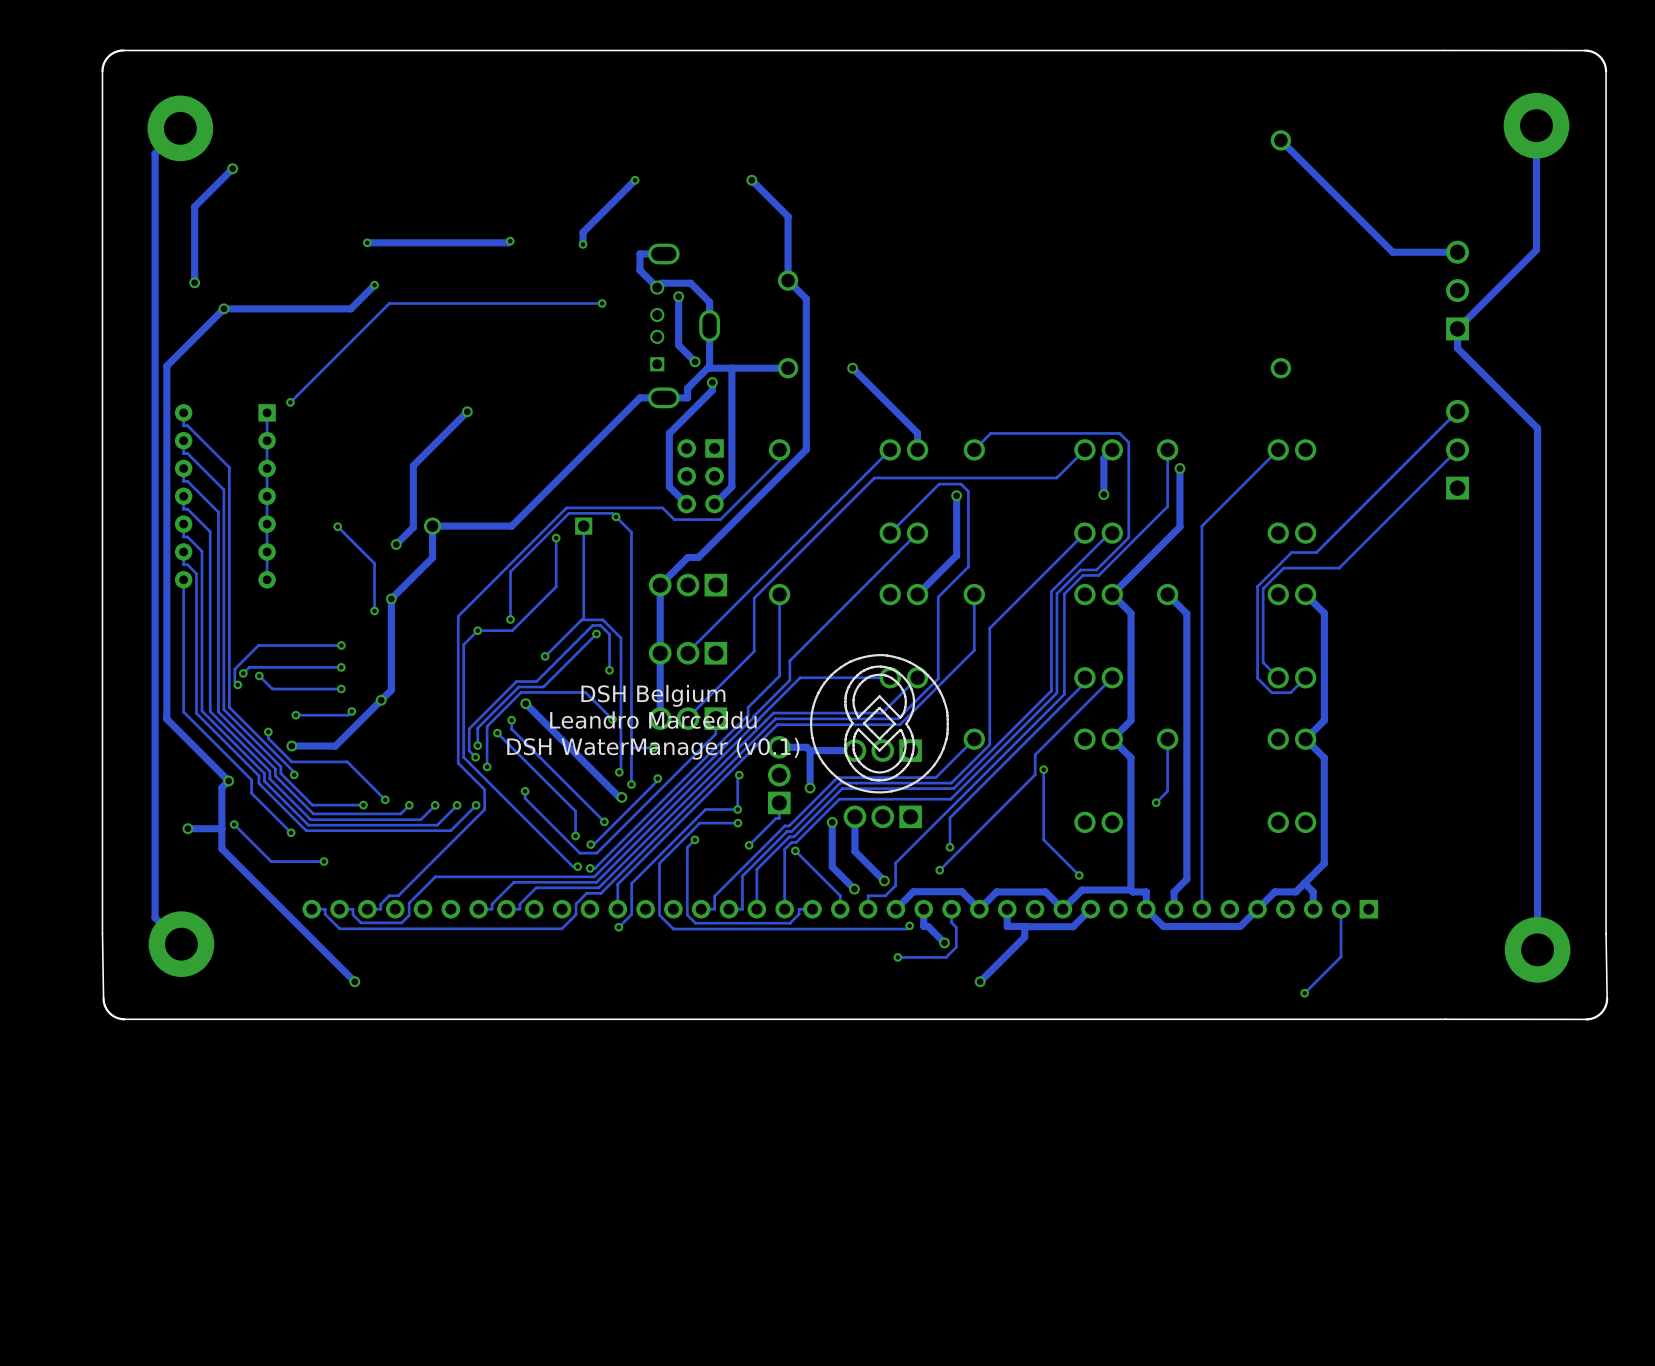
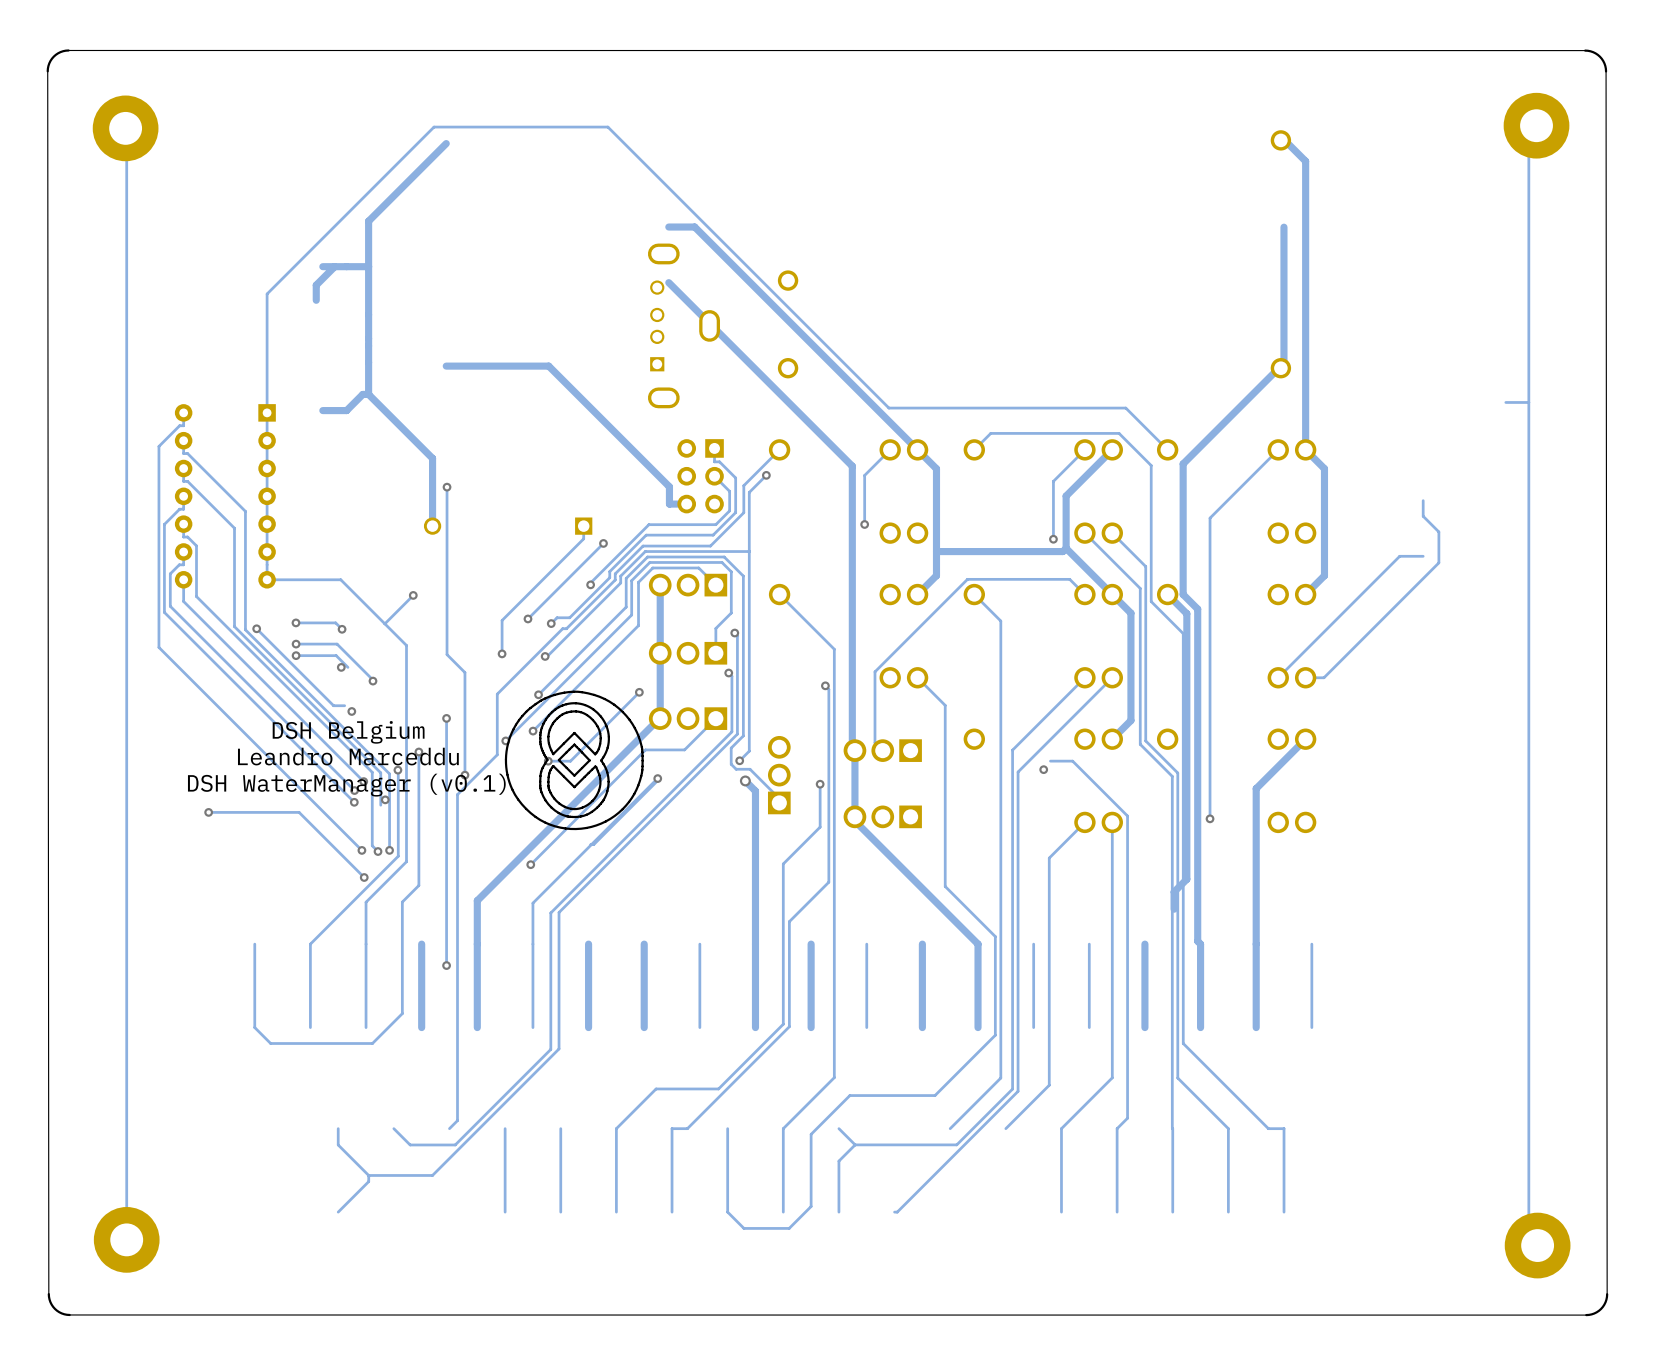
board edge: (1585, 50) (123, 50) (112, 53) (105, 60) (102, 71) (102, 933) (103, 998) (106, 1008) (114, 1016) (124, 1019) (1586, 1019) (1596, 1016) (1604, 1008) (1607, 998) (1606, 71) -> (1585, 50) (68, 50) (55, 54) (50, 60) (47, 71) (48, 1294) (53, 1306) (59, 1312) (69, 1314) (1586, 1315) (1598, 1310) (1604, 1304) (1607, 1294) (1606, 71)
track: (1536, 125) (1536, 249) (1457, 328) (1457, 348) (1537, 428) (1537, 949) -> (1536, 125) (1528, 133) (1528, 1236) (1537, 1245)
track: none -> (125, 128) (126, 1239)
track: (180, 128) (155, 153) (155, 917) (181, 944) -> none
part position: (180, 128) -> (125, 128)
track: (1280, 140) (1392, 252) (1457, 252) -> none
track: none -> (446, 143) (368, 221) (368, 394)
track: (232, 168) (194, 206) (194, 282) -> none
via: (232, 168) -> none
track: (635, 180) (583, 232) (583, 244) -> none
via: (635, 180) -> none
track: (751, 180) (788, 216) (788, 280) (806, 298) (806, 449) (698, 557) (687, 557) (660, 585) -> none
via: (751, 180) -> none
track: none -> (1283, 227) (1283, 363) (1183, 463) (1183, 594) (1197, 609) (1197, 941) (1200, 944) (1200, 1027)
track: (510, 241) (508, 242) (367, 242) -> none
via: (510, 241) -> none
via: (367, 242) -> none
via: (583, 244) -> none
track: (663, 253) (639, 253) (639, 270) (657, 287) (661, 283) (690, 283) (709, 302) (709, 368) -> none
track: none -> (334, 266) (316, 285) (316, 300)
track: none -> (368, 266) (322, 266)
via: (194, 282) -> none
track: none -> (668, 282) (852, 466) (852, 748) (854, 750) (854, 816)
track: (374, 285) (350, 308) (230, 308) -> none
via: (374, 285) -> none
part: (1457, 290) -> none
track: (678, 296) (678, 345) (695, 361) -> none
via: (678, 296) -> none
track: (602, 303) (389, 303) (290, 402) -> none
via: (602, 303) -> none
track: (223, 308) (166, 365) (166, 719) (228, 780) (221, 787) (221, 848) (354, 981) -> none
via: (223, 308) -> none
via: (695, 361) -> none
track: (731, 368) (731, 486) (714, 504) -> none
track: (788, 368) (707, 368) (687, 388) (687, 397) (639, 397) (511, 526) (432, 526) (432, 557) (391, 598) (391, 690) (335, 746) (291, 746) -> none
track: (852, 368) (917, 433) (917, 449) -> none
via: (852, 368) -> none
track: (712, 382) (712, 390) (669, 433) (669, 486) -> (446, 366) (548, 366) (669, 486)
via: (712, 382) -> none
track: none -> (368, 394) (432, 458) (432, 526)
track: none -> (368, 394) (362, 394) (346, 410) (322, 410)
via: (290, 402) -> none
track: none -> (1528, 402) (1505, 402)
track: (467, 411) (413, 465) (413, 527) (396, 544) -> none
via: (467, 411) -> none
track: (1457, 411) (1316, 552) (1291, 552) (1257, 586) (1257, 678) (1271, 692) (1290, 692) (1305, 677) -> (1423, 500) (1423, 516) (1438, 531) (1438, 562) (1323, 677) (1305, 677)
track: (183, 425) (187, 425) (229, 467) (229, 707) (294, 772) (294, 774) -> (183, 425) (179, 425) (158, 446) (158, 647) (361, 850)
track: (1119, 433) (1128, 442) (1128, 537) (1096, 569) (1080, 569) (1056, 593) (1056, 693) (950, 799) (839, 799) (796, 842) (791, 842) (784, 849) (784, 909) -> (1119, 433) (1151, 465) (1151, 601) (1183, 633) (1183, 1043) (1268, 1128) (1284, 1128) (1284, 1212)
track: none -> (714, 448) (714, 461) (719, 461) (735, 477) (735, 512) (713, 535) (646, 535) (609, 571) (609, 577) (569, 617) (557, 617) (551, 623)
track: (779, 449) (779, 460) (720, 519) (674, 519) (662, 507) (566, 507) (458, 616) (458, 763) (484, 789) (484, 809) (398, 895) (389, 895) (380, 904) (380, 909) (367, 909) -> (779, 449) (743, 485) (743, 512) (710, 546) (643, 546) (615, 573) (615, 579) (566, 628) (562, 628) (497, 694) (497, 754) (457, 794) (457, 1120) (449, 1128)
track: (1167, 449) (1167, 506) (1098, 575) (1082, 575) (1064, 593) (1064, 694) (895, 863) (895, 885) (885, 895) (868, 895) (868, 909) -> (1167, 449) (1125, 408) (888, 408) (607, 127) (434, 127) (267, 294) (267, 412)
track: (1457, 449) (1339, 568) (1283, 568) (1263, 588) (1263, 662) (1278, 677) -> (1423, 556) (1399, 556) (1278, 677)
part: (1457, 449) -> none
track: (1103, 458) (1103, 494) -> (1103, 458) (1066, 496) (1066, 548)
track: (1179, 468) (1179, 526) (1112, 594) -> (1066, 548) (1112, 594)
via: (1179, 468) -> none
track: none -> (766, 475) (749, 492) (749, 751) (739, 760)
via: none -> (766, 475)
track: (864, 475) (688, 653) -> (864, 475) (864, 524)
track: none -> (714, 476) (729, 491) (729, 510) (715, 524) (648, 524) (590, 584)
track: (1056, 477) (874, 477) (754, 598) (754, 651) (688, 718) -> (1056, 477) (1053, 481) (1053, 539)
track: (669, 486) (686, 504) -> (669, 486) (669, 504) (686, 504)
track: none -> (447, 487) (447, 654) (464, 672) (464, 775)
via: none -> (447, 487)
track: (223, 489) (223, 709) (280, 766) (280, 773) (312, 805) (363, 805) -> (223, 489) (245, 511) (245, 629) (389, 773) (389, 850)
via: (1103, 494) -> none
track: (956, 495) (956, 555) (936, 575) -> (668, 227) (694, 227) (936, 468) (936, 575)
via: (956, 495) -> none
track: (183, 509) (187, 509) (210, 531) (210, 711) (269, 771) (269, 778) (310, 819) (420, 819) (435, 805) -> (183, 509) (179, 509) (164, 524) (164, 612) (354, 802)
track: (218, 512) (218, 711) (275, 768) (275, 775) (313, 813) (400, 813) (409, 805) -> (218, 512) (234, 528) (234, 626) (380, 772) (380, 805)
via: (616, 516) -> none
track: (1210, 518) (1201, 526) (1201, 909) -> (1210, 518) (1210, 818)
via: none -> (864, 524)
track: (337, 526) (374, 563) (374, 611) -> none
via: (337, 526) -> none
track: (890, 533) (939, 484) (961, 484) (968, 491) (968, 566) (938, 597) (938, 678) (898, 718) (775, 718) (601, 893) (586, 893) (576, 903) (576, 914) (561, 928) (339, 928) (325, 914) (325, 909) (311, 909) -> none
track: (917, 533) (789, 660) (789, 680) (594, 876) (435, 876) (409, 903) (409, 915) (401, 922) (361, 922) (353, 914) (353, 909) (339, 909) -> none
track: (1084, 533) (989, 628) (989, 744) (951, 783) (840, 783) (791, 831) (787, 831) (742, 876) (742, 909) (729, 909) -> (1084, 533) (1140, 588) (1140, 744) (1172, 776) (1172, 1212)
track: (1112, 533) (1109, 533) (1051, 591) (1051, 690) (953, 788) (842, 788) (793, 836) (789, 836) (756, 869) (756, 909) -> (1112, 533) (1145, 566) (1145, 740) (1177, 773) (1177, 1078) (1228, 1128) (1228, 1212)
track: (556, 538) (556, 586) (512, 630) (477, 630) (463, 644) (463, 757) (572, 866) (577, 866) -> none
via: (556, 538) -> none
track: (583, 538) (583, 619) -> (583, 538) (502, 620) (502, 653)
via: none -> (1053, 539)
track: none -> (603, 543) (527, 618)
via: none -> (603, 543)
via: (396, 544) -> none
track: (196, 545) (201, 551) (201, 710) (264, 773) (264, 781) (308, 825) (437, 825) (457, 805) -> none
track: none -> (1066, 548) (1062, 551) (936, 551)
track: none -> (749, 551) (645, 551) (620, 576) (620, 582) (548, 655)
track: (183, 564) (187, 564) (196, 573) -> (196, 545) (196, 573)
track: none -> (183, 564) (179, 564) (170, 573) (170, 606) (354, 790)
track: none -> (267, 579) (340, 579) (406, 645) (406, 861) (366, 902) (366, 1027)
via: none -> (590, 584)
track: none -> (715, 585) (698, 567) (652, 567) (638, 582) (638, 625) (533, 731)
track: (779, 594) (779, 676) (748, 707) (748, 715) (594, 868) (590, 868) -> (779, 594) (834, 649) (834, 1077) (783, 1128) (783, 1212)
track: (974, 594) (974, 650) (900, 724) (777, 724) (617, 884) (617, 909) -> (974, 594) (1000, 621) (1000, 1078) (950, 1128)
track: none -> (1084, 594) (1069, 579) (967, 579) (874, 671) (874, 742) (882, 750)
track: (1305, 594) (1324, 613) (1324, 720) (1305, 739) (1324, 757) (1324, 863) (1304, 883) -> (1305, 594) (1324, 575) (1324, 468) (1305, 449) (1305, 161) (1283, 139)
track: none -> (413, 595) (384, 623)
via: none -> (413, 595)
track: (196, 596) (196, 713) (258, 775) (258, 783) (306, 830) (450, 830) (476, 805) -> (196, 596) (372, 772) (372, 845) (378, 851)
via: (391, 598) -> none
track: (183, 601) (183, 712) (251, 779) (251, 793) (291, 832) -> (183, 601) (363, 781)
via: (374, 611) -> none
track: (510, 619) (510, 571) (568, 513) (612, 513) (631, 532) (631, 784) -> none
via position: (510, 619) -> (527, 618)
track: none -> (295, 622) (335, 622) (342, 629)
via: none -> (295, 622)
via: none -> (551, 623)
track: none -> (256, 628) (333, 705) (344, 705)
via: none -> (256, 628)
via: (477, 630) -> none
track: (596, 633) (543, 686) (518, 686) (477, 728) (477, 745) -> none
via: (596, 633) -> none
track: none -> (734, 633) (737, 635) (737, 734) (559, 912) (559, 1048) (432, 1175) (368, 1175)
via: none -> (734, 633)
track: none -> (296, 644) (337, 644) (372, 681)
via: none -> (296, 644)
track: (341, 645) (258, 645) (234, 669) (234, 681) (237, 684) -> none
via position: (341, 645) -> (342, 629)
via: none -> (502, 653)
track: none -> (715, 653) (715, 628) (731, 613) (731, 571) (722, 562) (649, 562) (631, 580) (631, 615) (505, 740)
track: none -> (296, 655) (336, 655) (347, 667)
via: none -> (296, 655)
line: (878, 655) (850, 661) (831, 675) (821, 688) (815, 700) (811, 726) (817, 752) (831, 772) (840, 780) (855, 788) (881, 792) (906, 786) (919, 779) (931, 768) (939, 757) (945, 744) (947, 719) (942, 695) (928, 675) (904, 660) (878, 655) -> none
track: (545, 656) (581, 619) (602, 619) (620, 637) (620, 770) (619, 772) -> none
line: (881, 666) (898, 672) (911, 689) (913, 708) (906, 723) (911, 733) (913, 745) (910, 759) (904, 769) (891, 778) (879, 780) (863, 776) (853, 767) (848, 759) (845, 751) (845, 739) (852, 723) (846, 712) (845, 701) (847, 689) (855, 677) (867, 668) (881, 666) -> none
track: (341, 667) (249, 667) (243, 673) -> none
track: (609, 670) (609, 634) (600, 625) (592, 625) (536, 681) (516, 681) (469, 728) (469, 750) (475, 757) -> none
via: (609, 670) -> none
via: (243, 673) -> none
track: none -> (728, 673) (731, 676) (731, 731) (550, 912) (550, 1049) (455, 1144) (410, 1144) (393, 1128)
via: none -> (728, 673)
line: (881, 674) (892, 678) (902, 689) (905, 701) (902, 714) (900, 717) (879, 696) (858, 717) (853, 703) (856, 690) (867, 677) (881, 674) -> none
track: (259, 675) (272, 689) (341, 689) -> none
via: (259, 675) -> none
track: (890, 677) (800, 677) (596, 882) (513, 882) (492, 904) (492, 909) (478, 909) -> none
track: (917, 677) (882, 713) (773, 713) (598, 887) (536, 887) (519, 904) (519, 909) (506, 909) -> (917, 677) (945, 705) (945, 886) (995, 936) (995, 1035) (935, 1095) (849, 1095) (811, 1134) (811, 1206) (789, 1228) (743, 1228) (727, 1212) (727, 1128)
track: (1084, 677) (1084, 682) (949, 817) (949, 847) -> (1084, 677) (1012, 750) (1012, 1089) (956, 1144) (855, 1144)
via: none -> (372, 681)
via: (237, 684) -> none
track: none -> (825, 685) (828, 689) (828, 882) (789, 921) (789, 1026) (687, 1128) (672, 1128) (672, 1212)
via: none -> (825, 685)
via: (341, 689) -> none
line: none -> (573, 691) (545, 698) (526, 711) (515, 724) (510, 736) (506, 763) (512, 789) (526, 808) (535, 816) (550, 824) (575, 829) (601, 823) (614, 815) (626, 805) (634, 794) (639, 780) (642, 756) (637, 732) (622, 712) (599, 696) (573, 691)
track: none -> (639, 692) (570, 761) (548, 761)
via: none -> (639, 692)
via: none -> (538, 694)
text: DSH Belgium (653, 695) -> none
via: (381, 700) -> none
track: (525, 703) (619, 797) (621, 797) -> none
via: (525, 703) -> none
line: none -> (575, 703) (593, 709) (606, 726) (608, 744) (601, 760) (606, 770) (608, 781) (605, 795) (598, 805) (586, 814) (574, 817) (558, 812) (548, 804) (543, 796) (540, 788) (540, 776) (547, 759) (541, 748) (540, 738) (542, 725) (550, 713) (562, 705) (575, 703)
line: (879, 708) (894, 723) (879, 739) (863, 723) (879, 708) -> none
track: (351, 711) (348, 715) (295, 715) -> none
line: none -> (576, 711) (587, 715) (597, 726) (600, 738) (597, 750) (595, 754) (574, 732) (553, 754) (548, 740) (551, 726) (562, 714) (576, 711)
via: (295, 715) -> none
track: none -> (446, 718) (446, 965)
via: none -> (446, 718)
track: none -> (660, 718) (477, 900) (477, 1027)
track: (715, 718) (715, 734) (596, 853) (579, 853) (525, 798) (525, 791) -> (715, 718) (684, 749) (645, 749) (530, 864)
track: (612, 719) (585, 692) (521, 692) (487, 726) (487, 766) -> none
via: (612, 719) -> none
track: (511, 720) (511, 729) (604, 821) -> none
via: (511, 720) -> none
text: Leandro Marceddu (653, 720) -> none
line: (858, 729) (854, 738) (853, 751) (864, 766) (872, 771) (881, 772) (890, 769) (899, 761) (905, 747) (901, 730) (879, 750) (858, 729) -> none
via: none -> (533, 731)
track: (268, 732) (268, 738) (291, 761) (347, 761) (385, 799) -> none
via: (268, 732) -> none
text: none -> DSH Belgium (348, 732)
track: (497, 733) (575, 811) (575, 836) -> none
via: (497, 733) -> none
track: (974, 739) (935, 777) (837, 777) (789, 825) (784, 825) (714, 896) (714, 909) (701, 909) -> none
track: (1112, 739) (1130, 757) (1130, 890) -> none
track: (1167, 739) (1167, 791) (1156, 802) -> none
track: none -> (1305, 739) (1256, 788) (1256, 1027)
via: none -> (505, 740)
line: none -> (574, 744) (589, 760) (574, 775) (558, 760) (574, 744)
via: (477, 745) -> none
via: (291, 746) -> none
track: (653, 747) (631, 747) -> none
via: (653, 747) -> none
track: (779, 747) (806, 747) (810, 750) -> none
text: DSH WaterManager (v0.1) (653, 748) -> none
track: (810, 750) (810, 788) -> none
track: (854, 750) (810, 750) -> none
track: none -> (418, 751) (418, 885) (402, 902) (402, 1013) (372, 1043) (270, 1043) (254, 1027) (254, 944)
via: none -> (418, 751)
track: (1035, 754) (1035, 774) (939, 870) -> (1035, 754) (1018, 772) (1018, 1091) (897, 1212) (894, 1212)
text: none -> Leandro Marceddu (348, 756)
via: (475, 757) -> none
via: none -> (548, 761)
track: none -> (1050, 761) (1072, 761) (1127, 816) (1127, 1118) (1117, 1128) (1117, 1212)
via: (487, 766) -> none
line: none -> (553, 766) (548, 775) (548, 788) (559, 803) (567, 808) (576, 808) (585, 806) (594, 798) (600, 784) (595, 766) (574, 787) (553, 766)
track: (1043, 769) (1043, 839) (1079, 875) -> none
track: none -> (397, 770) (398, 856) (310, 944) (310, 1027)
via: none -> (397, 770)
via: (619, 772) -> none
via: (294, 774) -> none
via: none -> (464, 775)
track: (739, 775) (737, 776) (737, 809) (705, 809) (631, 883) (631, 914) (618, 927) -> none
via position: (739, 775) -> (739, 760)
track: none -> (657, 778) (532, 903) (532, 1027)
via: (228, 780) -> none
track: none -> (745, 780) (755, 791) (755, 1027)
via: none -> (745, 780)
via: none -> (363, 781)
via: (631, 784) -> none
track: none -> (820, 784) (820, 827) (783, 863) (783, 1024) (718, 1088) (656, 1088) (616, 1128) (616, 1212)
via: none -> (820, 784)
text: none -> DSH WaterManager (v0.1) (346, 785)
via: (810, 788) -> none
via: none -> (354, 790)
via: (525, 791) -> none
via: (621, 797) -> none
via: none -> (354, 802)
track: (779, 802) (779, 818) (776, 818) (749, 845) -> (779, 802) (779, 798) (750, 769) (736, 769) (731, 764) (731, 748) (743, 735) (743, 576) (724, 557) (647, 557) (626, 578) (626, 607) (538, 694)
via position: (1156, 802) -> (1210, 818)
via: (363, 805) -> none
via: (409, 805) -> none
via: (435, 805) -> none
via: (457, 805) -> none
via: (476, 805) -> none
via: (737, 809) -> none
track: none -> (208, 812) (299, 812) (364, 877)
via: (604, 821) -> none
track: (854, 821) (854, 851) (884, 880) -> (854, 821) (978, 944) (978, 1027)
track: (832, 822) (832, 866) (854, 889) -> none
via: (832, 822) -> none
track: none -> (1084, 822) (1049, 858) (1049, 1085) (1005, 1128)
track: none -> (1112, 822) (1112, 1077) (1061, 1128) (1061, 1212)
track: (737, 823) (699, 823) (659, 863) (659, 915) (673, 929) (906, 929) (909, 925) -> none
via: (737, 823) -> none
track: (234, 824) (271, 861) (324, 861) -> none
via position: (234, 824) -> (208, 812)
via: (187, 828) -> none
track: (221, 828) (187, 828) -> none
via: (291, 832) -> none
via: (575, 836) -> none
track: (694, 839) (687, 847) (687, 914) (695, 923) (790, 923) (799, 914) (799, 909) (812, 909) -> none
via: (694, 839) -> none
via: (590, 844) -> none
via: (749, 845) -> none
via: (949, 847) -> none
via: none -> (361, 850)
via: none -> (389, 850)
track: (795, 850) (840, 895) (840, 909) -> none
via: (795, 850) -> none
via: none -> (378, 851)
via: (324, 861) -> none
via: none -> (530, 864)
via: (577, 866) -> none
via: (590, 868) -> none
via: (939, 870) -> none
via: (1079, 875) -> none
via: none -> (364, 877)
via: (884, 880) -> none
track: (1304, 883) (1313, 891) (1313, 909) -> none
track: (1304, 883) (1295, 891) (1274, 891) (1240, 926) (1163, 926) (1146, 909) (1146, 891) (1132, 891) (1130, 890) -> none
via: (854, 889) -> none
track: (1130, 890) (1082, 890) (1062, 909) (1045, 891) (996, 891) (979, 909) (961, 891) (913, 891) (895, 909) -> none
part: (840, 909) -> none
track: (923, 909) (923, 926) (928, 926) (944, 942) -> none
track: (951, 909) (951, 922) (956, 927) (956, 947) (946, 957) (897, 957) -> none
track: (1007, 909) (1007, 926) (1024, 926) -> none
track: (1090, 909) (1073, 926) (1024, 926) -> none
track: (1341, 909) (1341, 956) (1304, 993) -> none
via: (909, 925) -> none
track: (1024, 926) (1024, 937) (980, 981) -> none
via: (618, 927) -> none
via: (944, 942) -> none
part: (181, 944) -> none
track: none -> (421, 944) (421, 1027)
track: none -> (588, 944) (588, 1027)
track: none -> (644, 944) (644, 1027)
track: none -> (699, 944) (699, 1027)
track: none -> (811, 944) (811, 1027)
track: none -> (866, 944) (866, 1027)
track: none -> (922, 944) (922, 1027)
track: none -> (1033, 944) (1033, 1027)
track: none -> (1089, 944) (1089, 1027)
track: none -> (1144, 944) (1144, 1027)
track: none -> (1311, 944) (1311, 1027)
part: (1537, 949) -> none
via: (897, 957) -> none
via: none -> (446, 965)
via: (354, 981) -> none
via: (980, 981) -> none
via: (1304, 993) -> none
track: none -> (338, 1128) (338, 1144) (368, 1175)
track: none -> (505, 1128) (505, 1212)
track: none -> (560, 1128) (560, 1212)
track: none -> (838, 1128) (855, 1144)
track: none -> (855, 1144) (838, 1161) (838, 1212)
track: none -> (368, 1175) (368, 1181) (338, 1212)
part: none -> (126, 1239)
part: none -> (1537, 1245)

